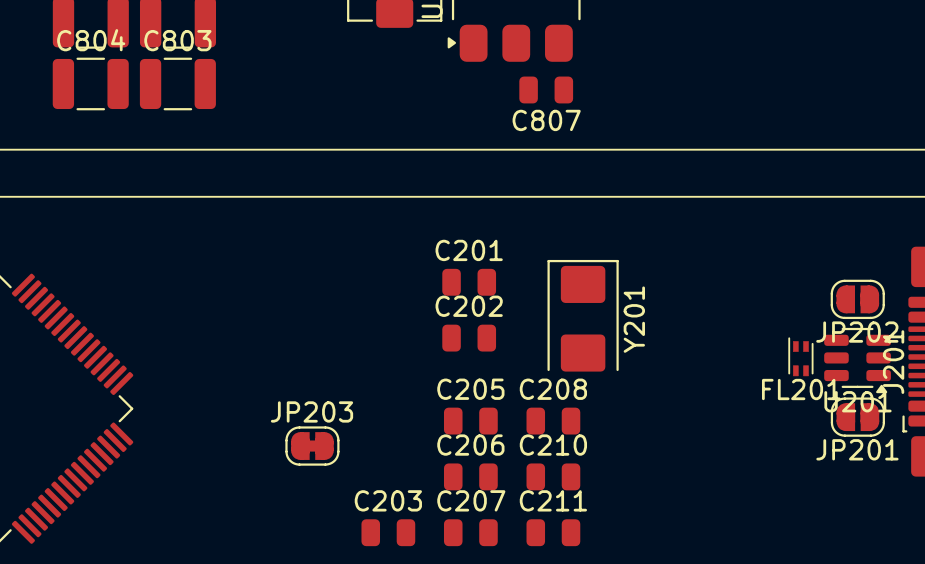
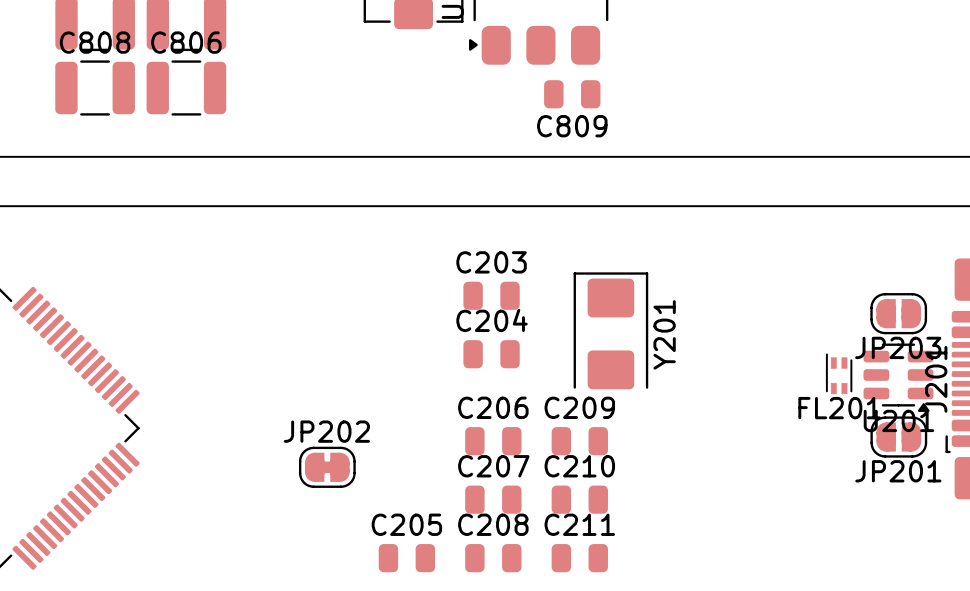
C804 name: C804 (91, 40) -> C808 (95, 42)
C803 name: C803 (177, 40) -> C806 (186, 42)
C807 name: C807 (546, 120) -> C809 (572, 126)
C201 name: C201 (469, 250) -> C203 (491, 262)
C202 name: C202 (469, 306) -> C204 (492, 320)
JP202 name: JP202 (857, 332) -> JP203 (898, 347)
C205 name: C205 (470, 389) -> C206 (493, 407)
C208 name: C208 (553, 389) -> C209 (579, 407)
JP203 name: JP203 (312, 411) -> JP202 (326, 431)
C206 name: C206 (470, 445) -> C207 (493, 466)
C203 name: C203 (388, 500) -> C205 (406, 524)
C207 name: C207 (471, 500) -> C208 (493, 524)

